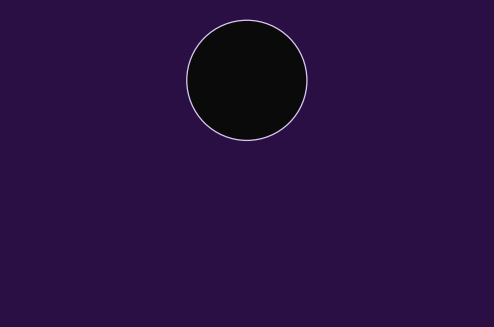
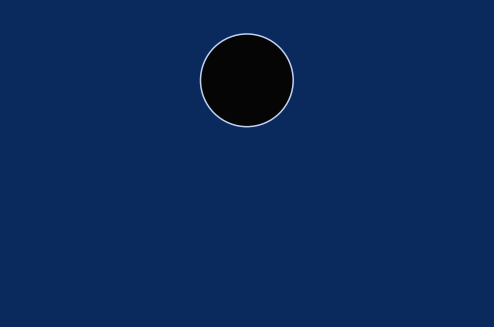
part footprint: [186, 20, 307, 141] -> [200, 33, 294, 127]

